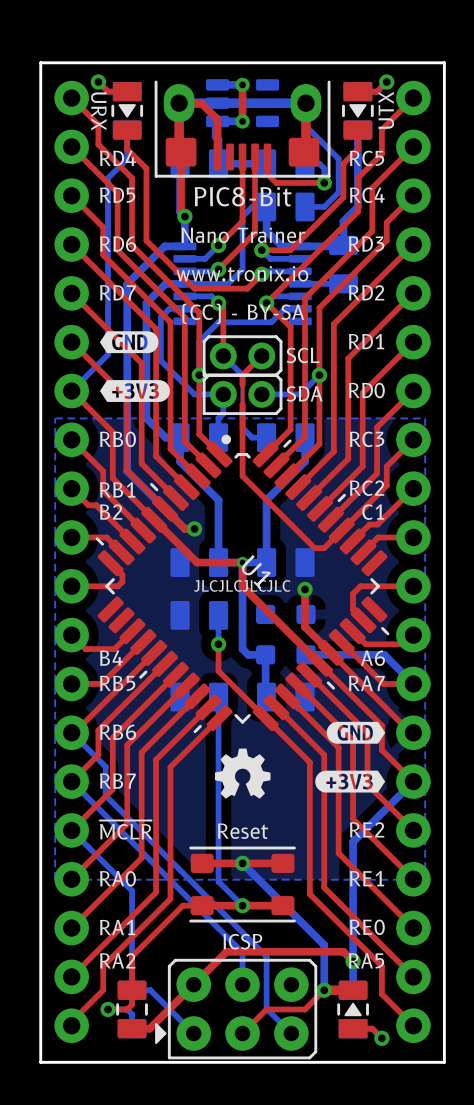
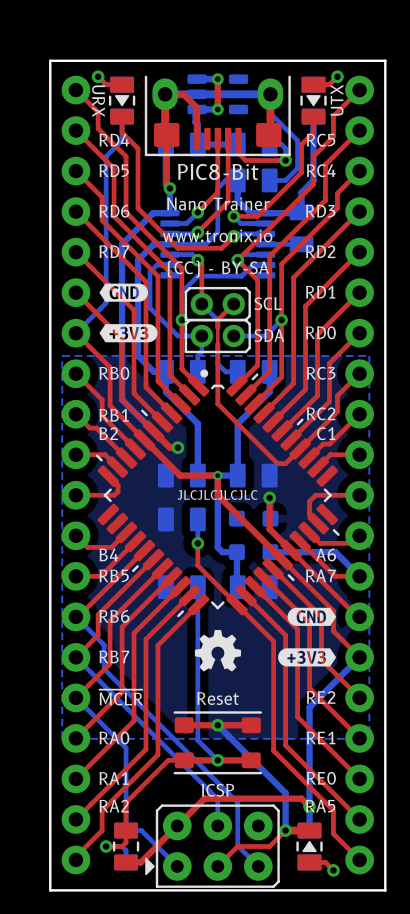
U1 name: U1 (256, 571) -> none

